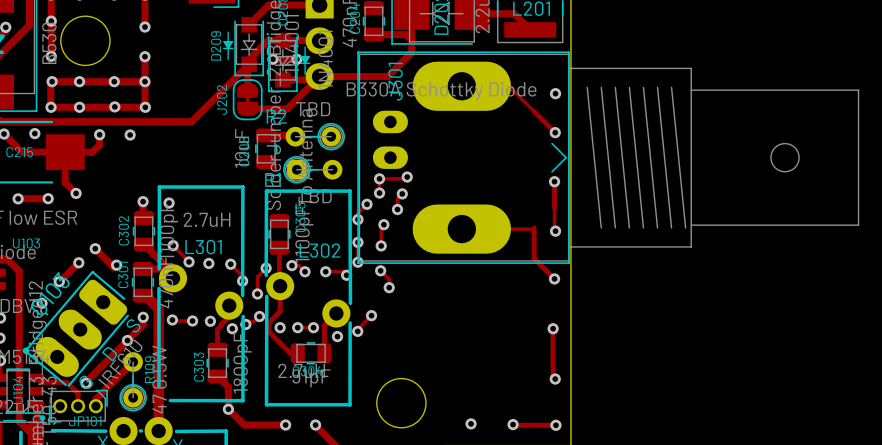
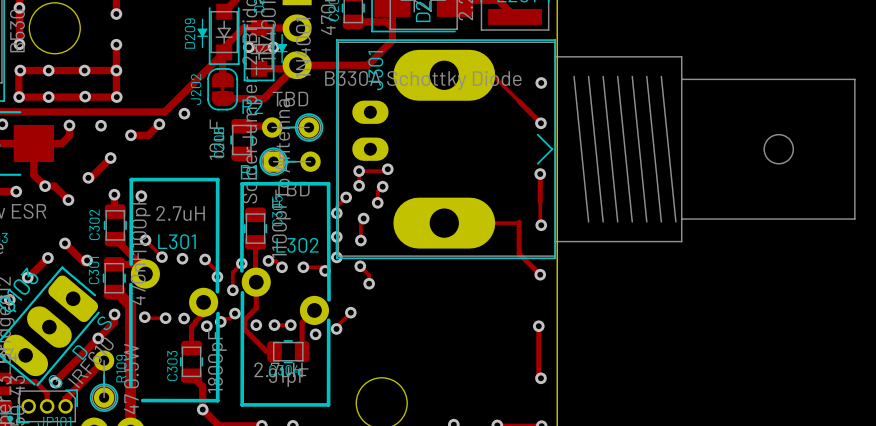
via: none -> (184, 113)
track: none -> (159, 124) (148, 135) (130, 135)
via: none -> (159, 124)
via: none -> (130, 135)
track: none -> (110, 158) (90, 177) (88, 177)
via: none -> (110, 158)
via: none -> (88, 177)
track: none -> (45, 186) (54, 186) (68, 200)
via: none -> (68, 200)

